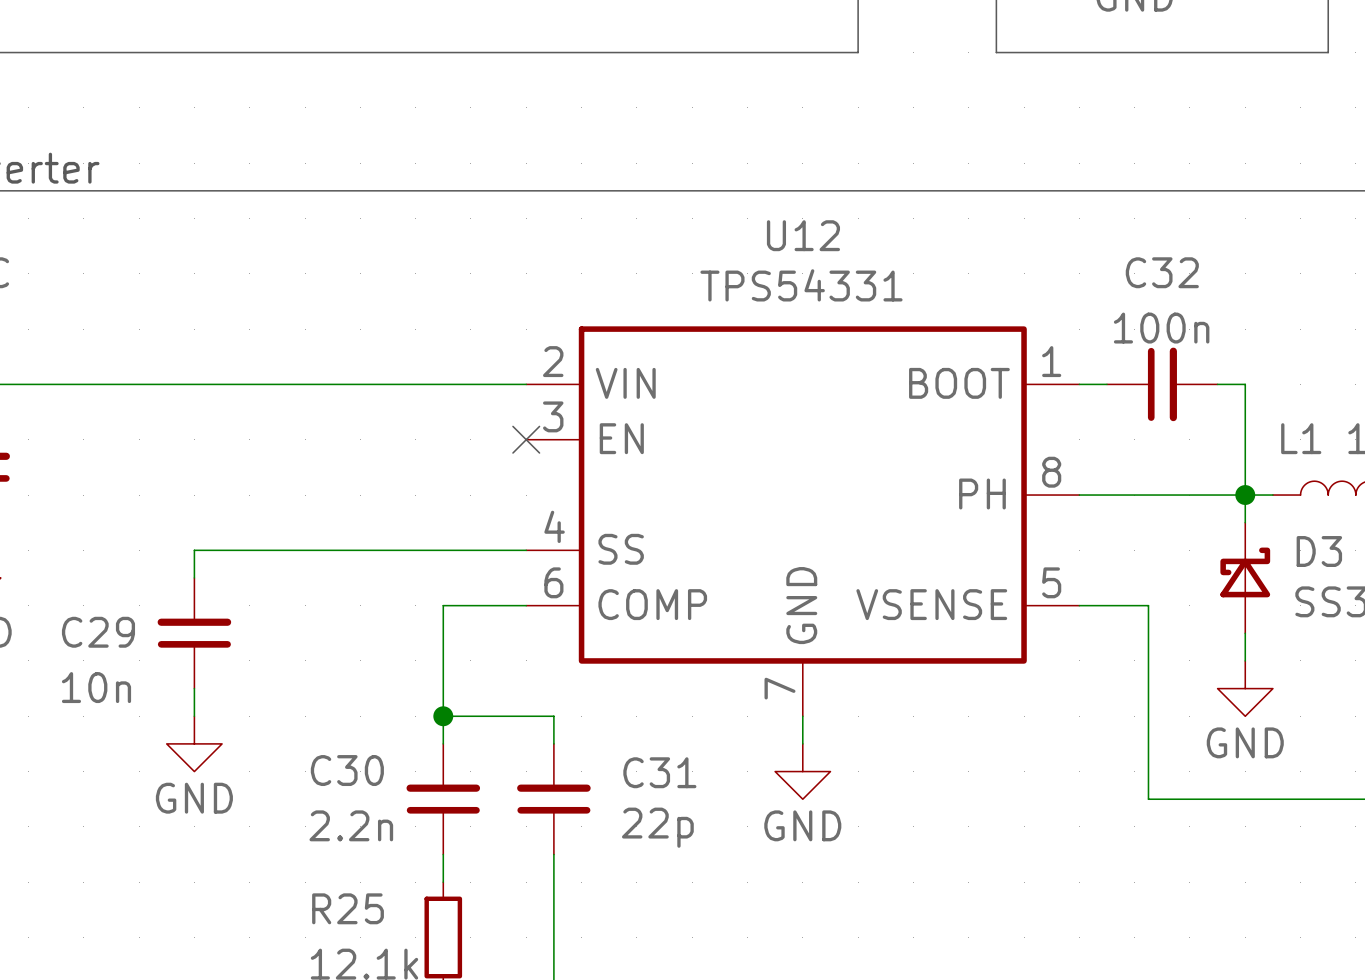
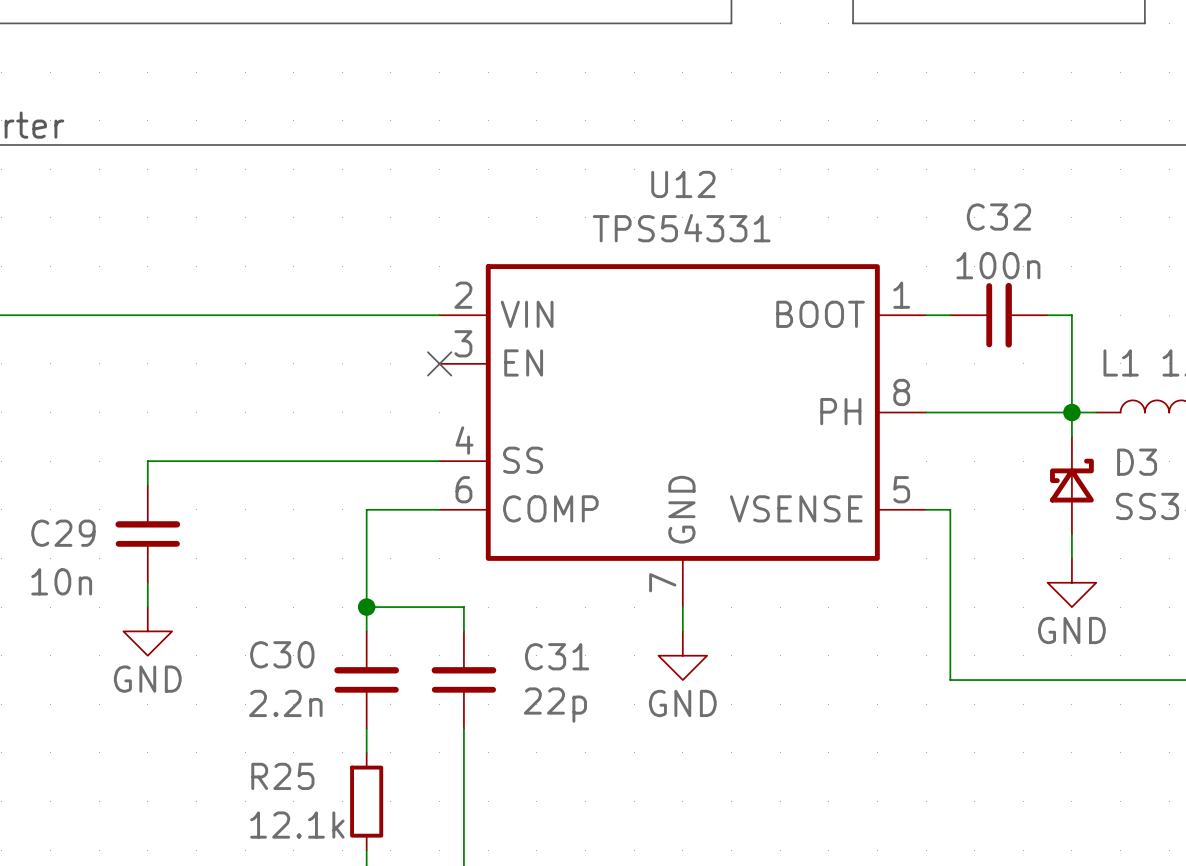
wire: (1107, 605) (1148, 605) (1148, 799) -> (950, 509) (950, 680) (986, 680)

